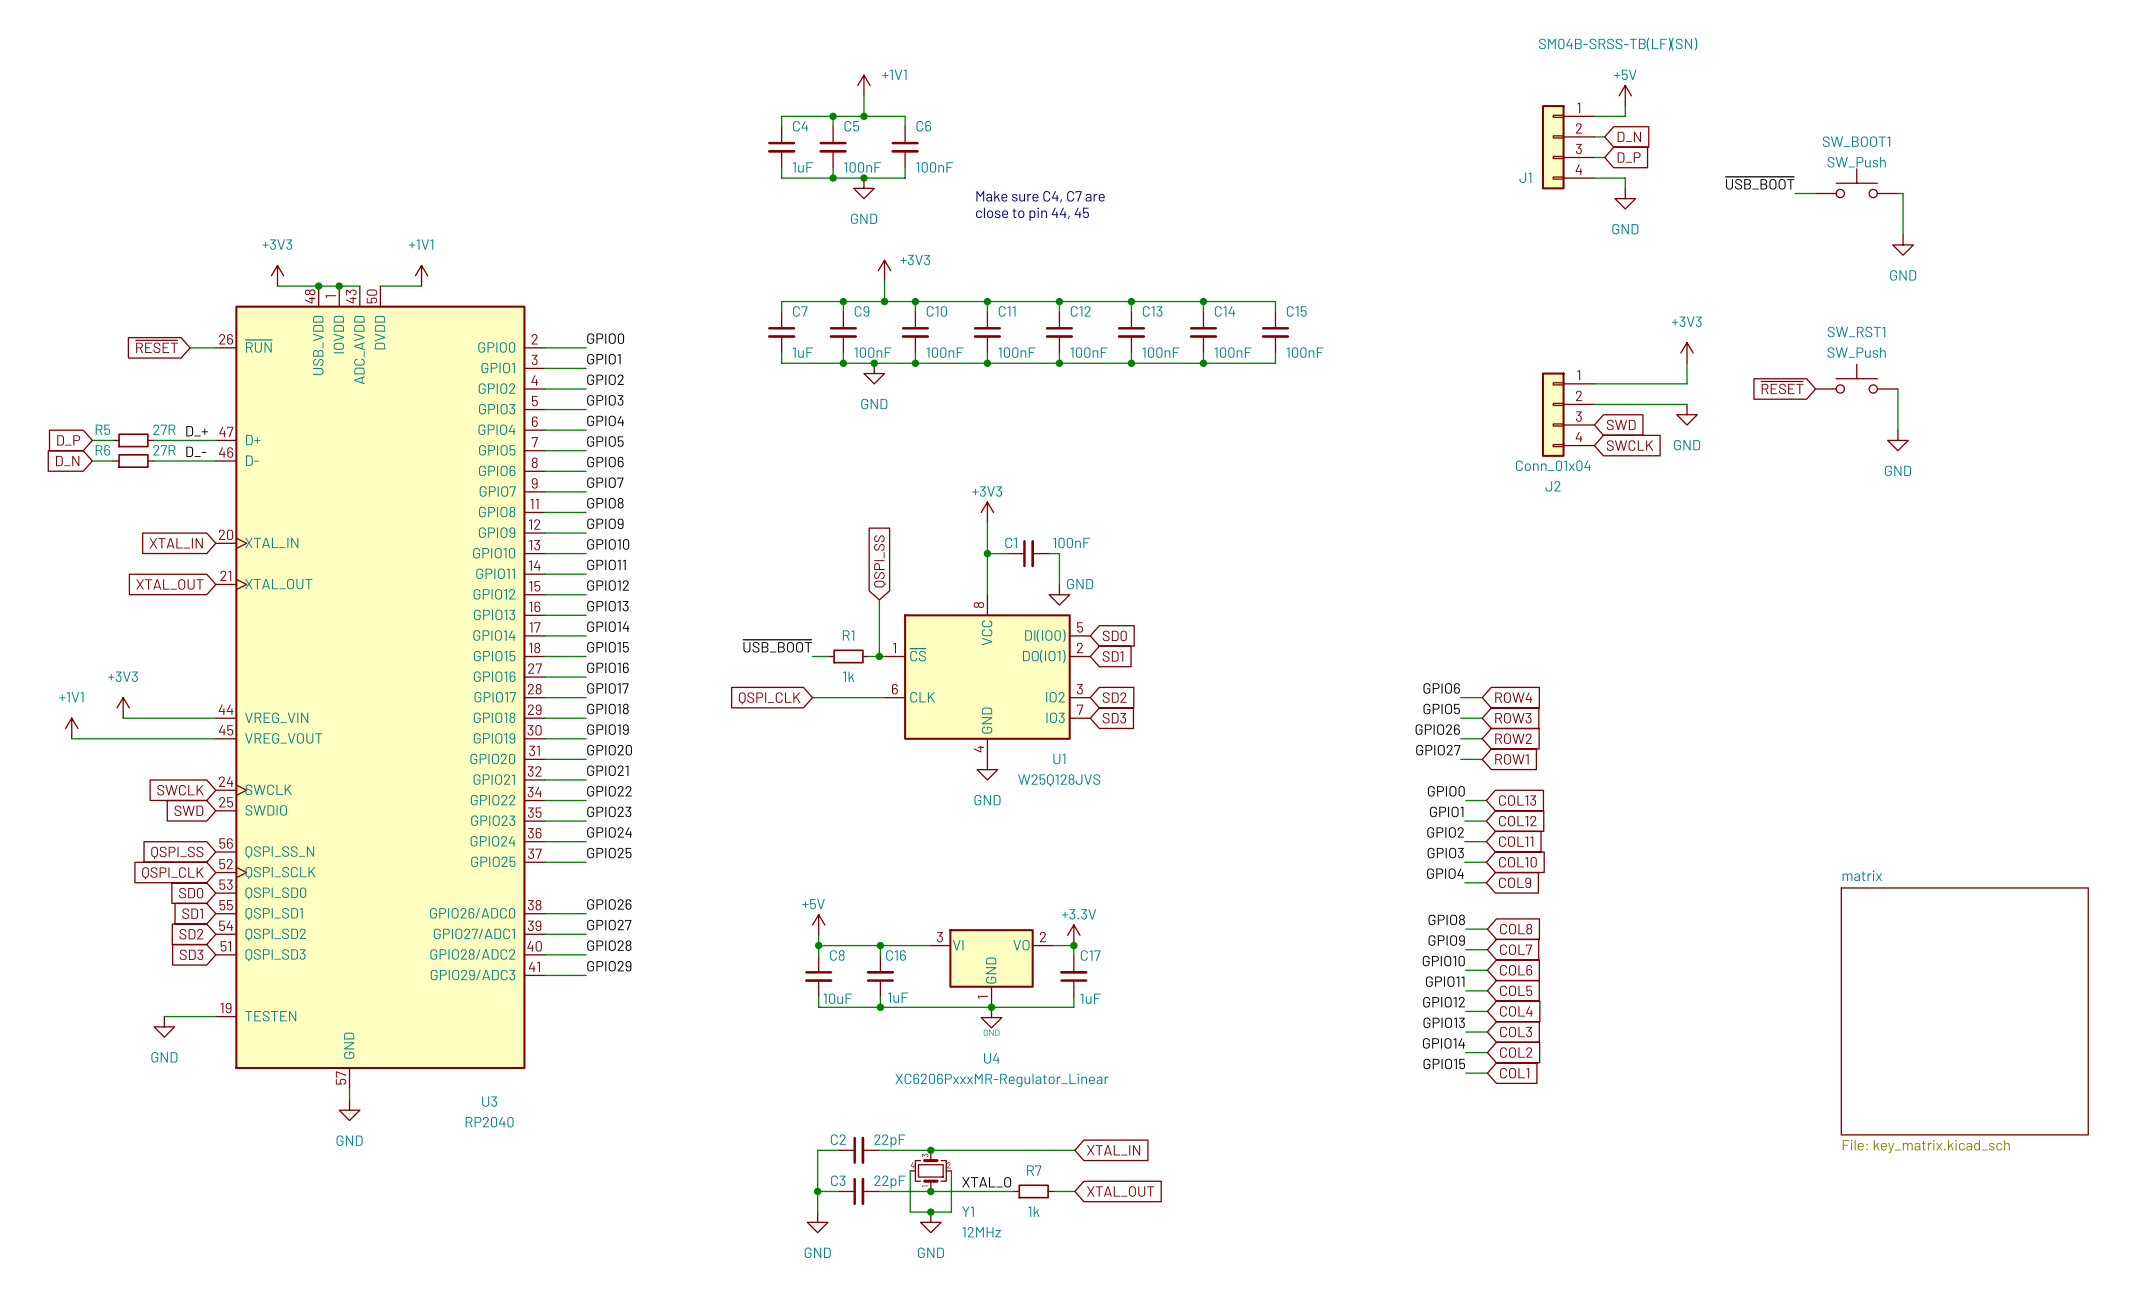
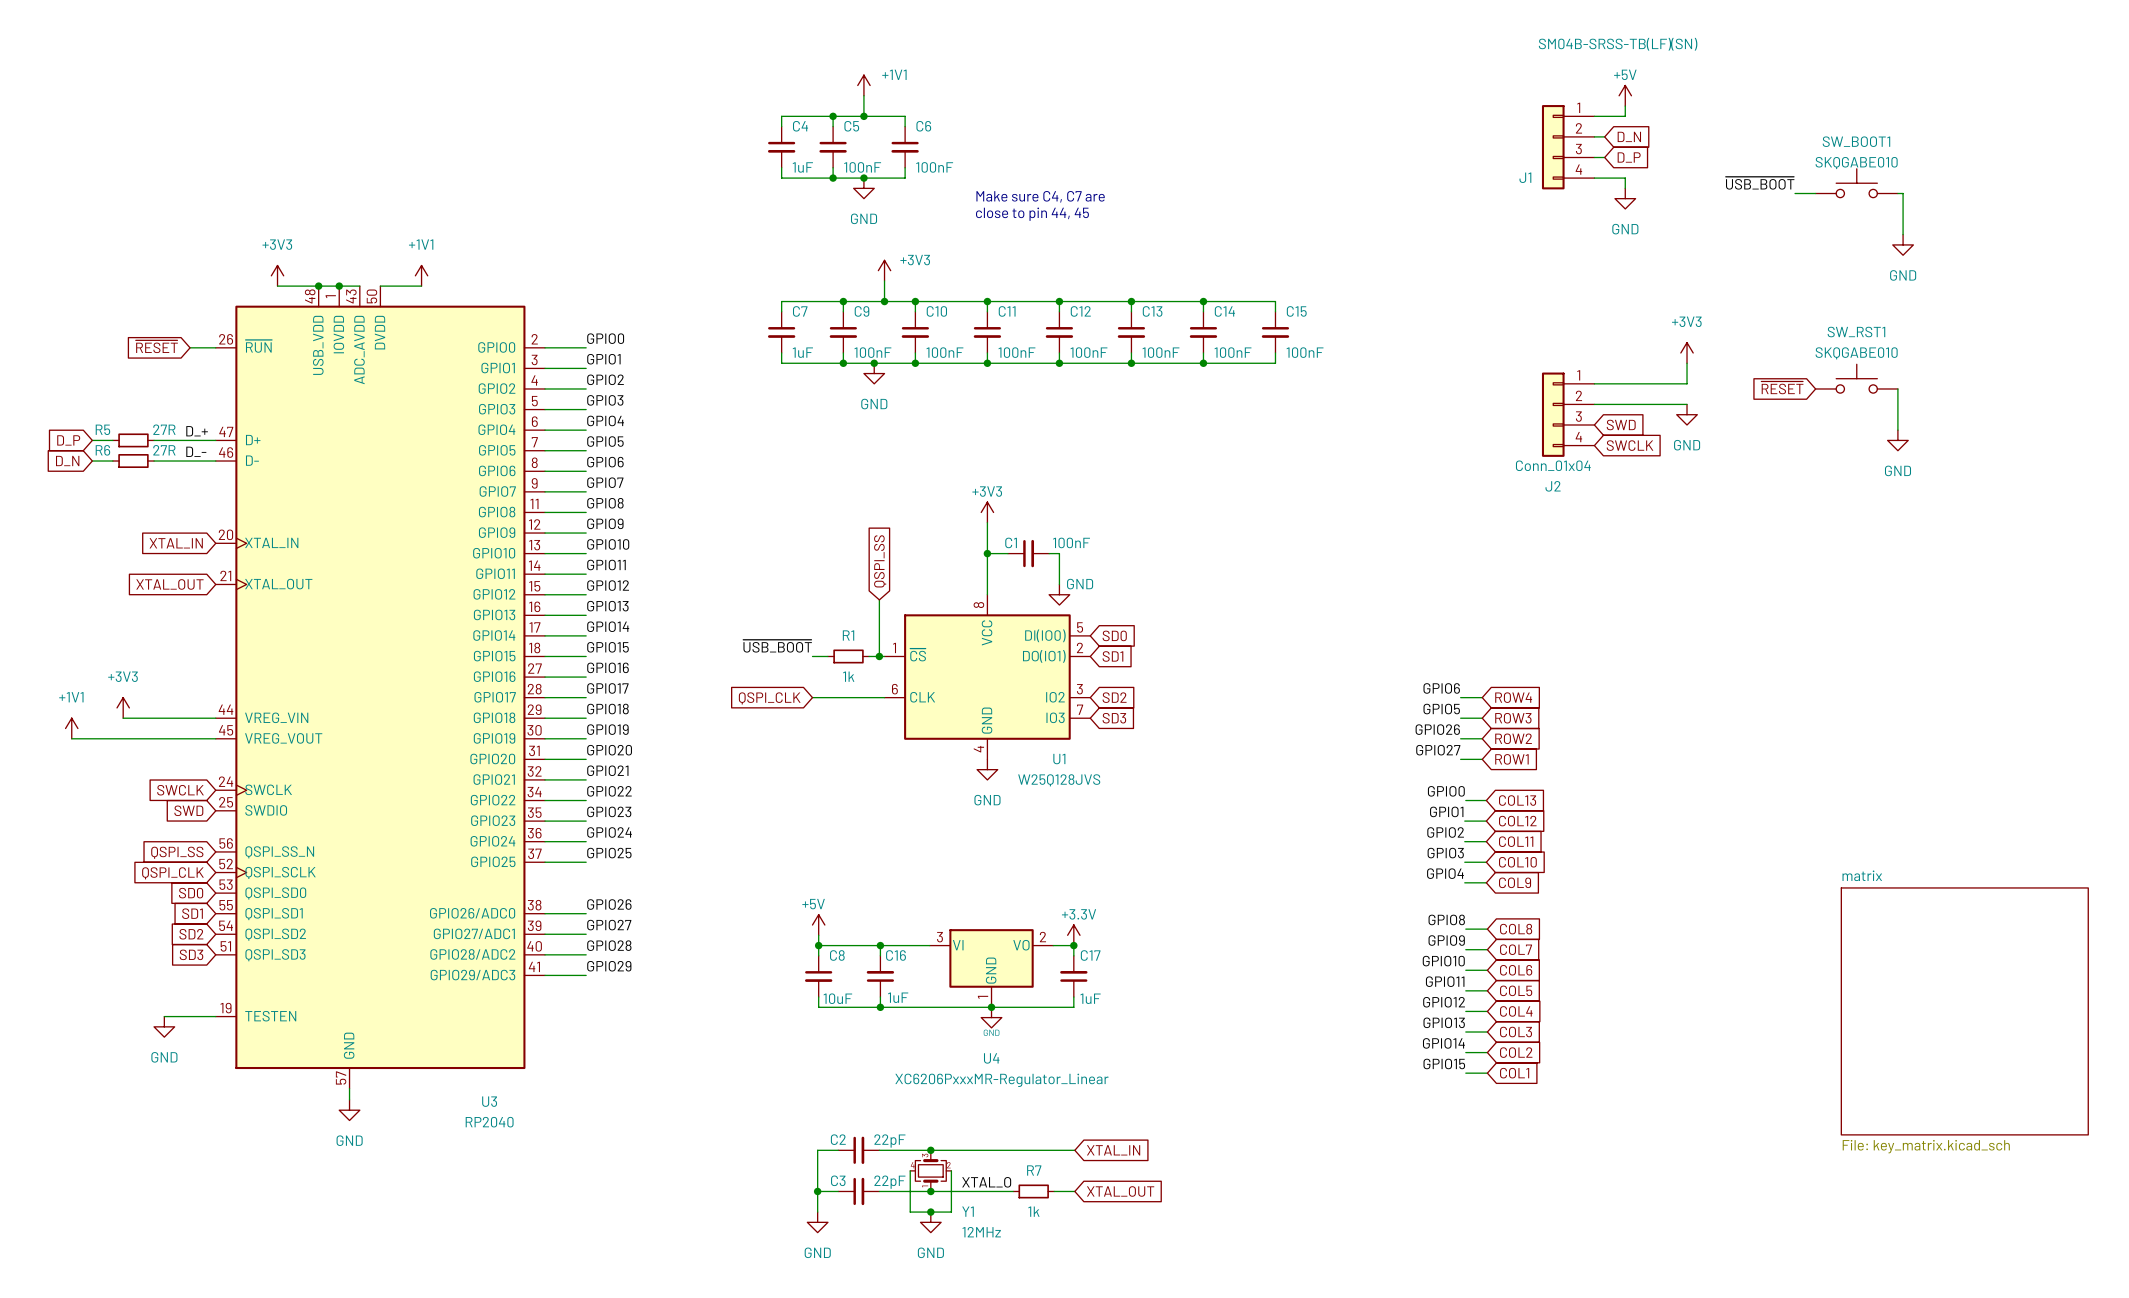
SW_BOOT1 value: SW_Push (1856, 162) -> SKQGABE010 (1856, 163)
SW_RST1 value: SW_Push (1856, 352) -> SKQGABE010 (1856, 353)

